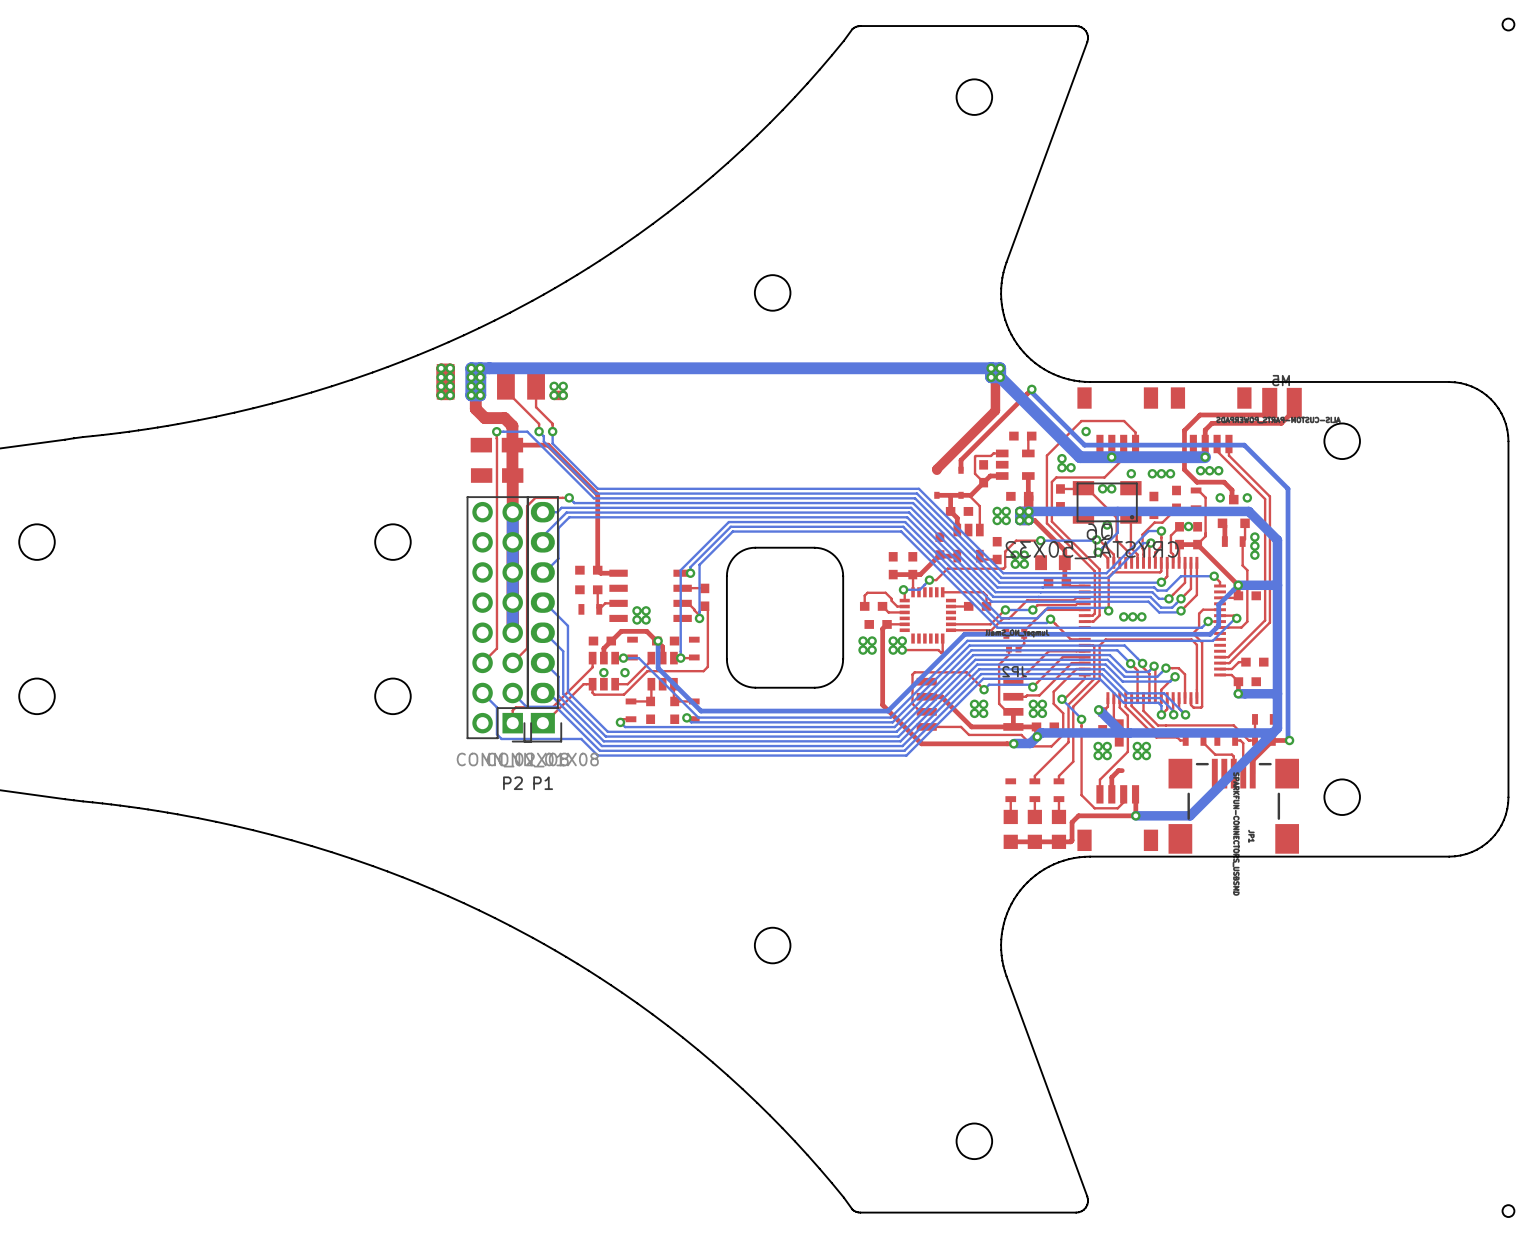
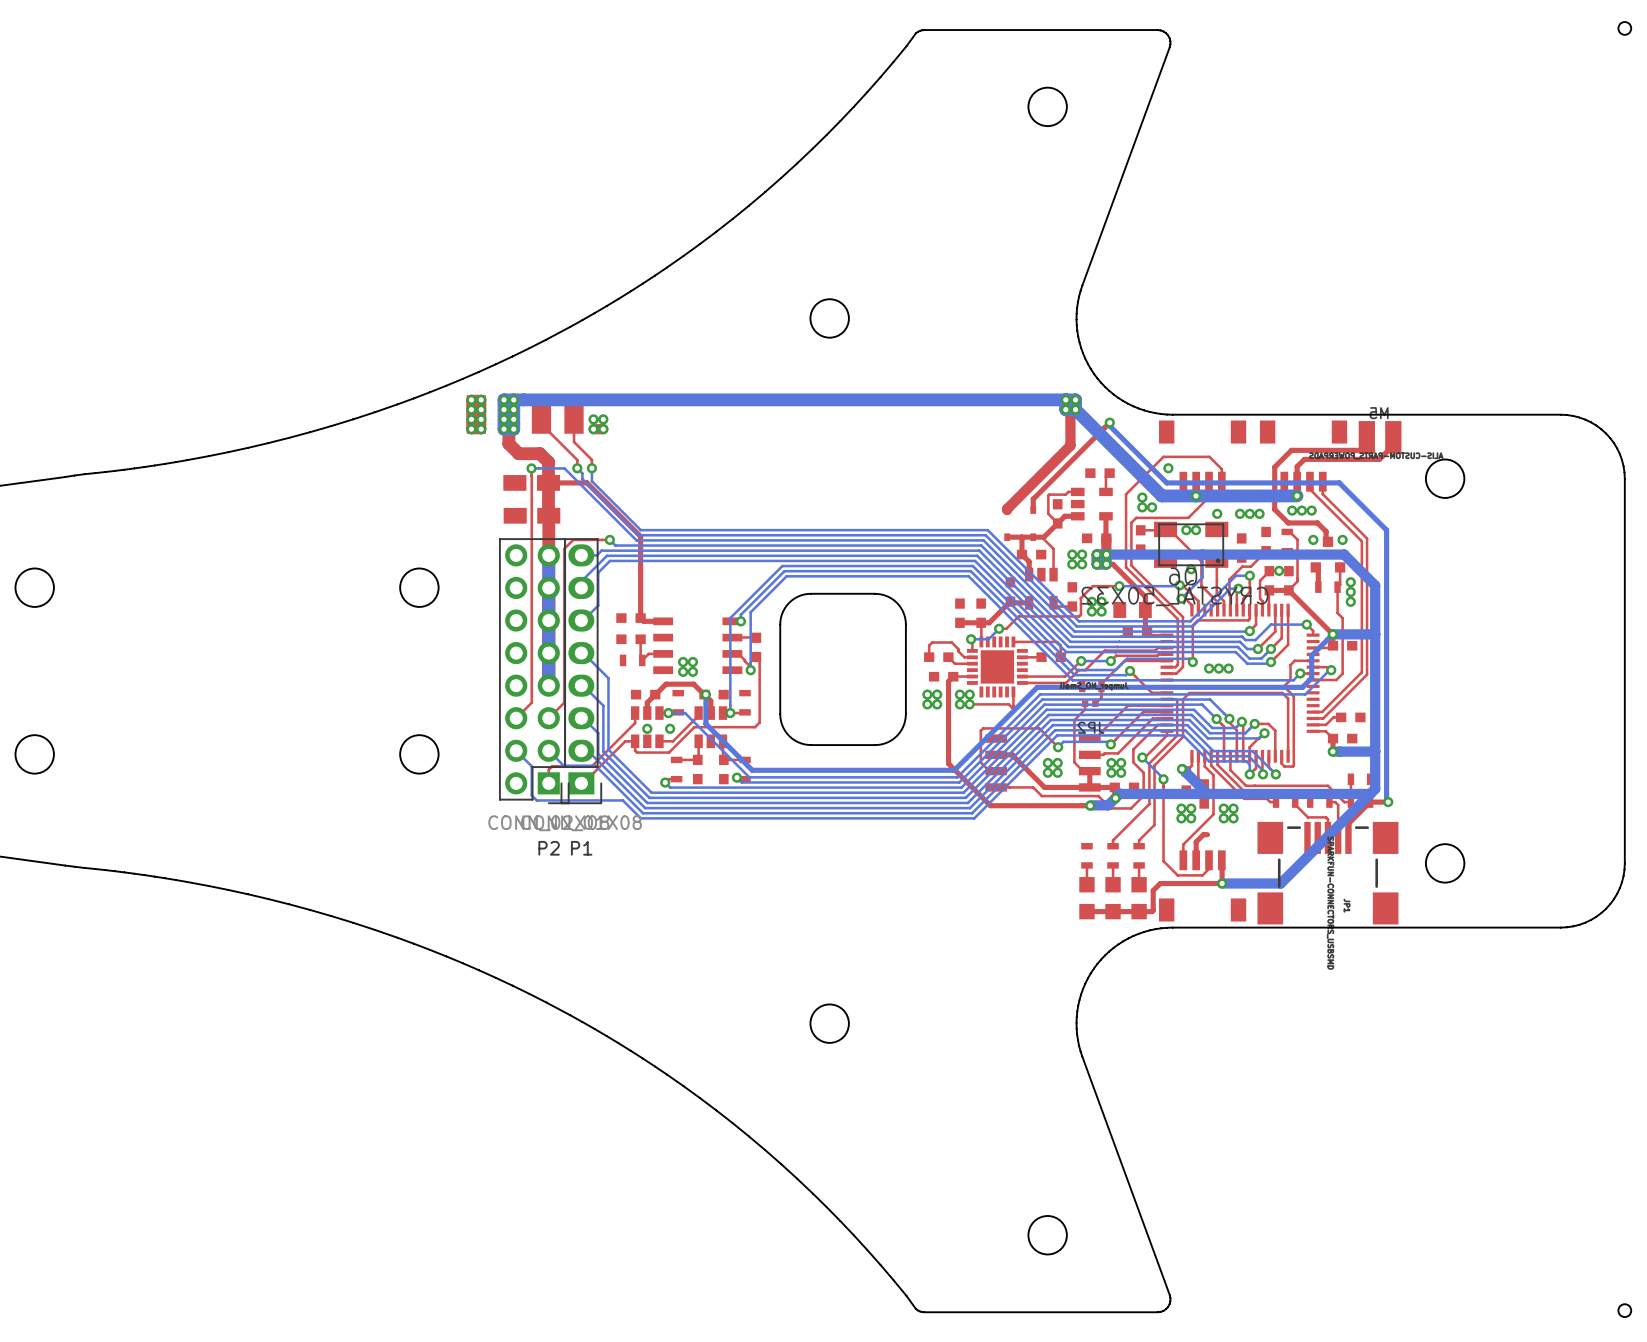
part footprint: [899, 587, 957, 644] -> [966, 636, 1028, 698]

